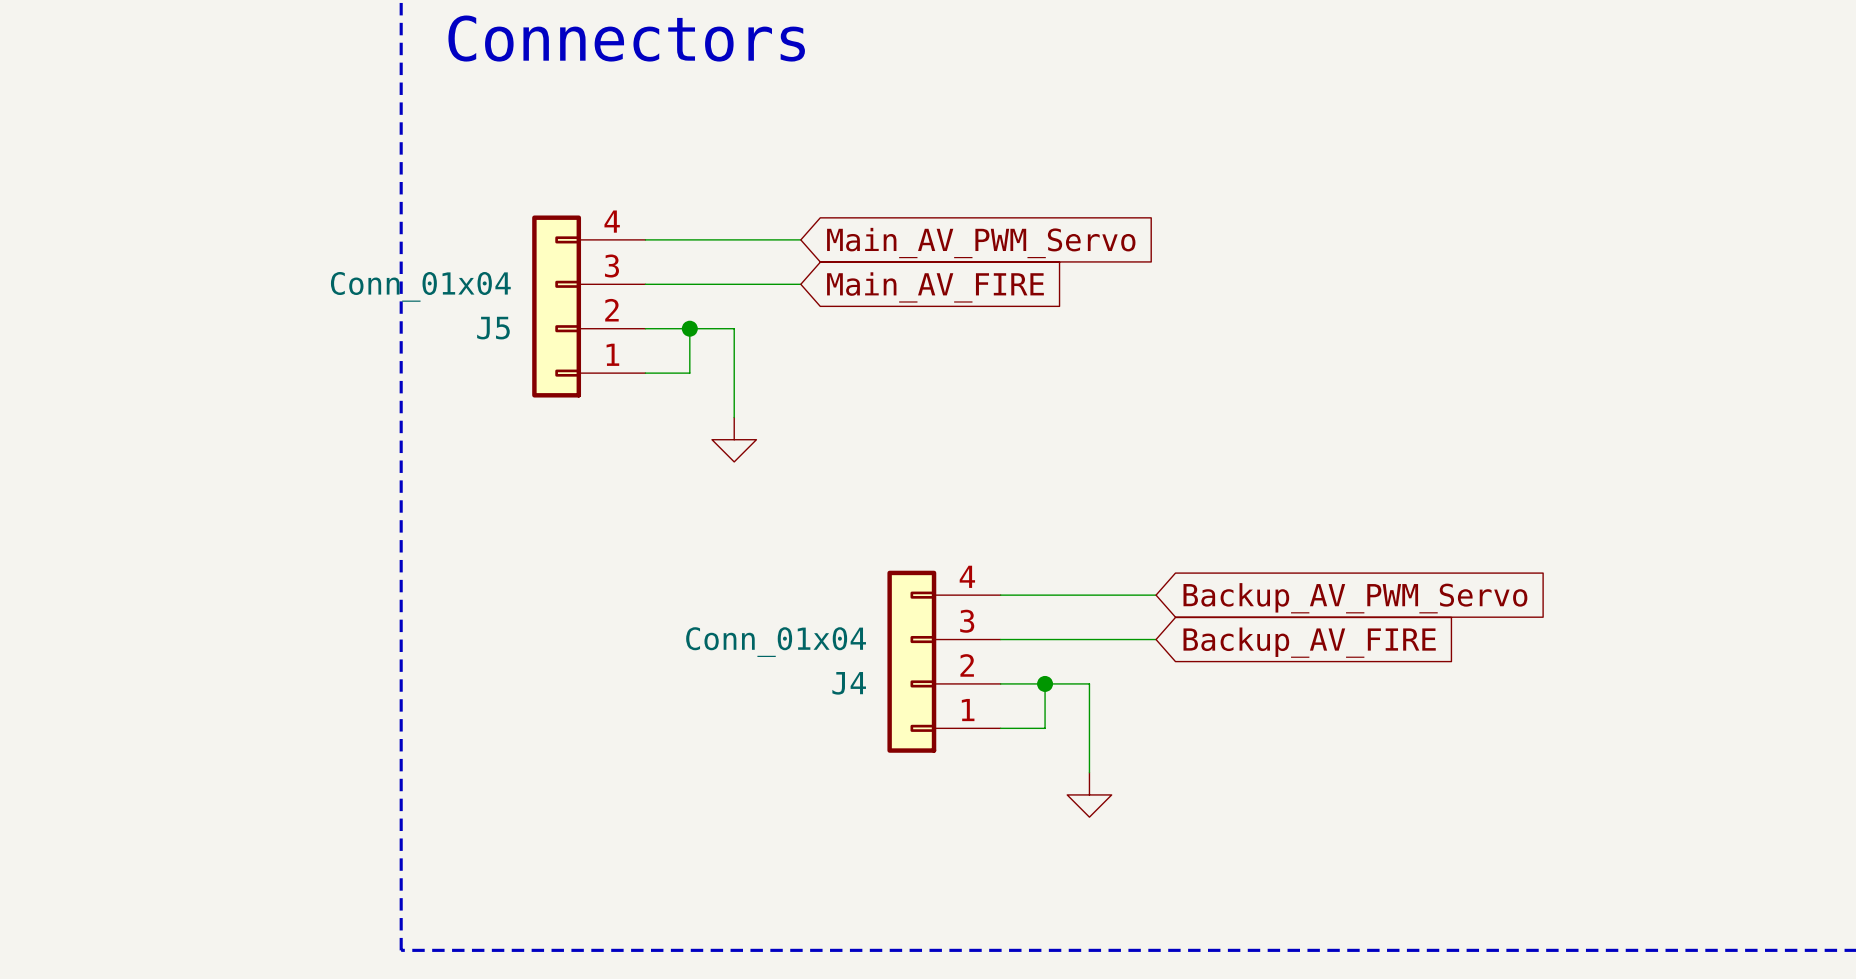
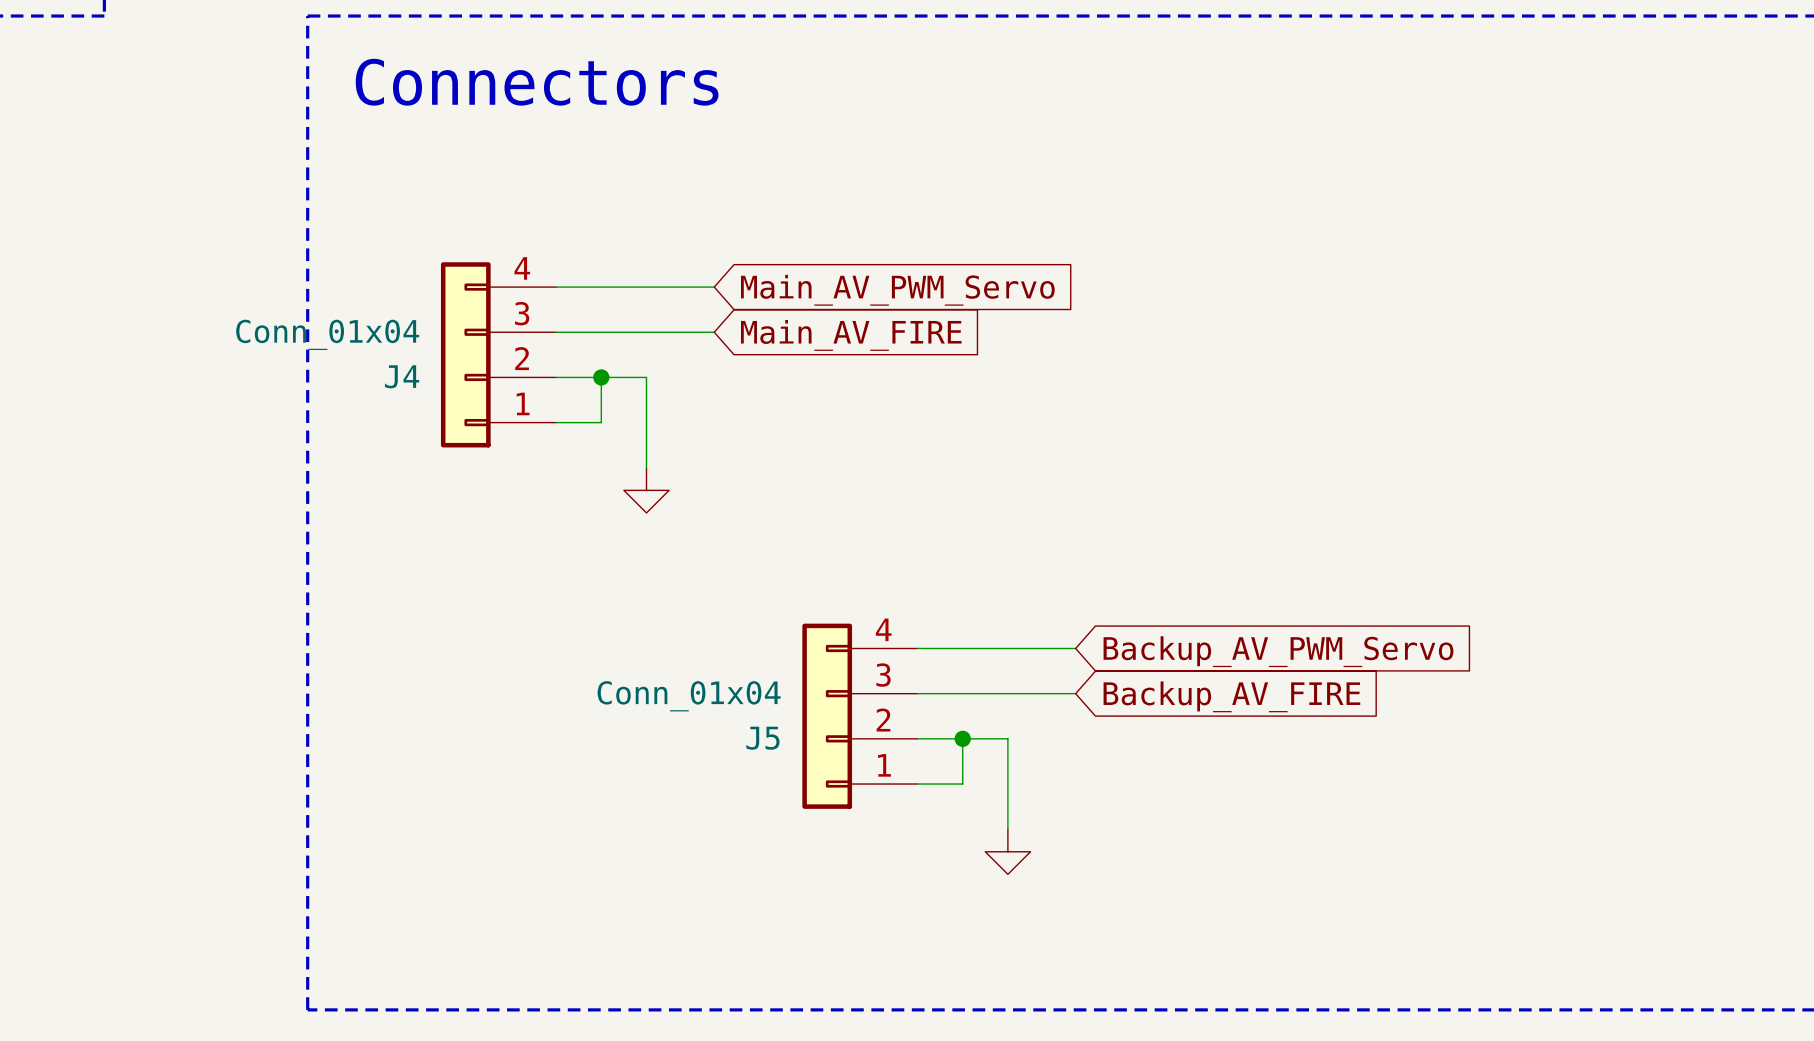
J5 name: J5 (493, 328) -> J4 (402, 376)
J4 name: J4 (849, 683) -> J5 (762, 738)

